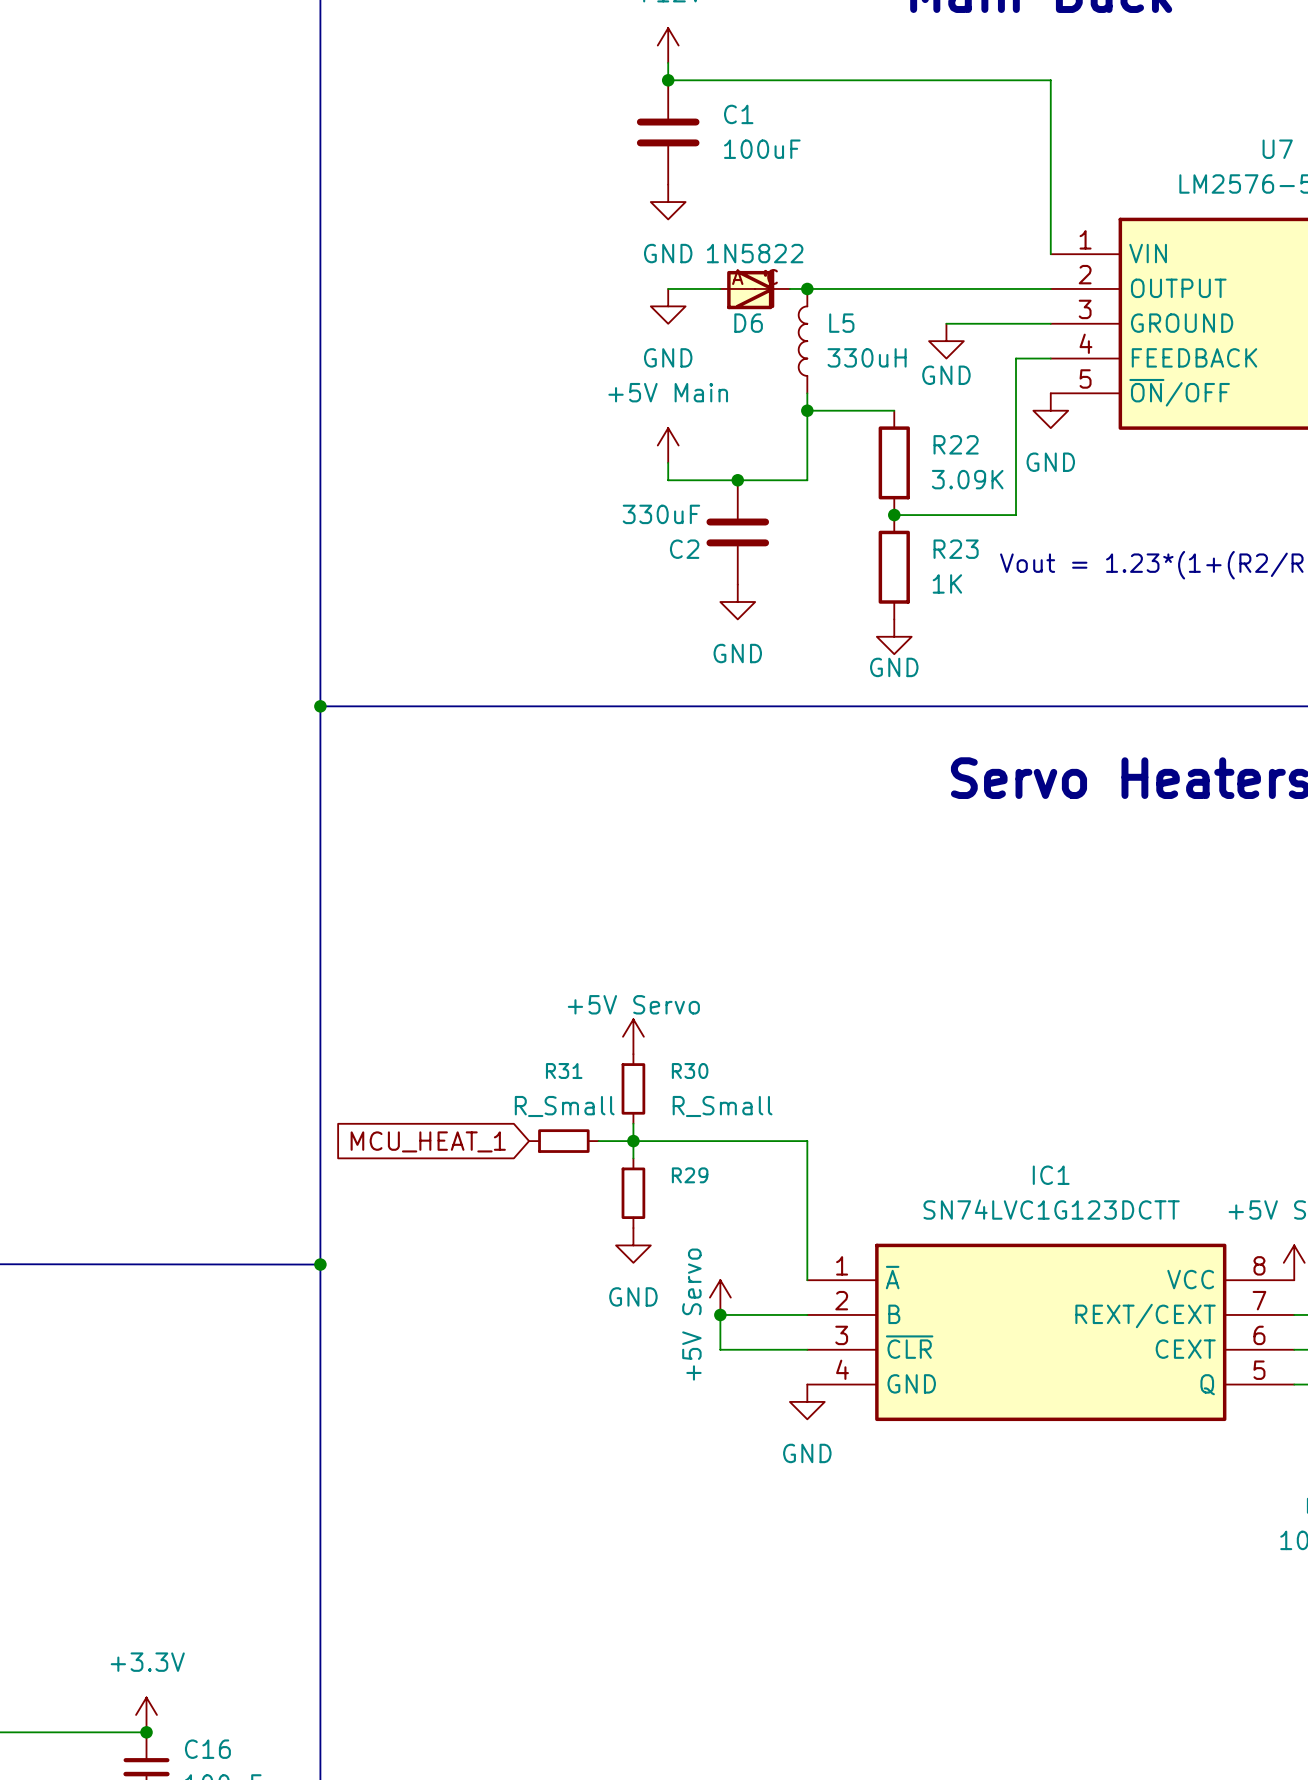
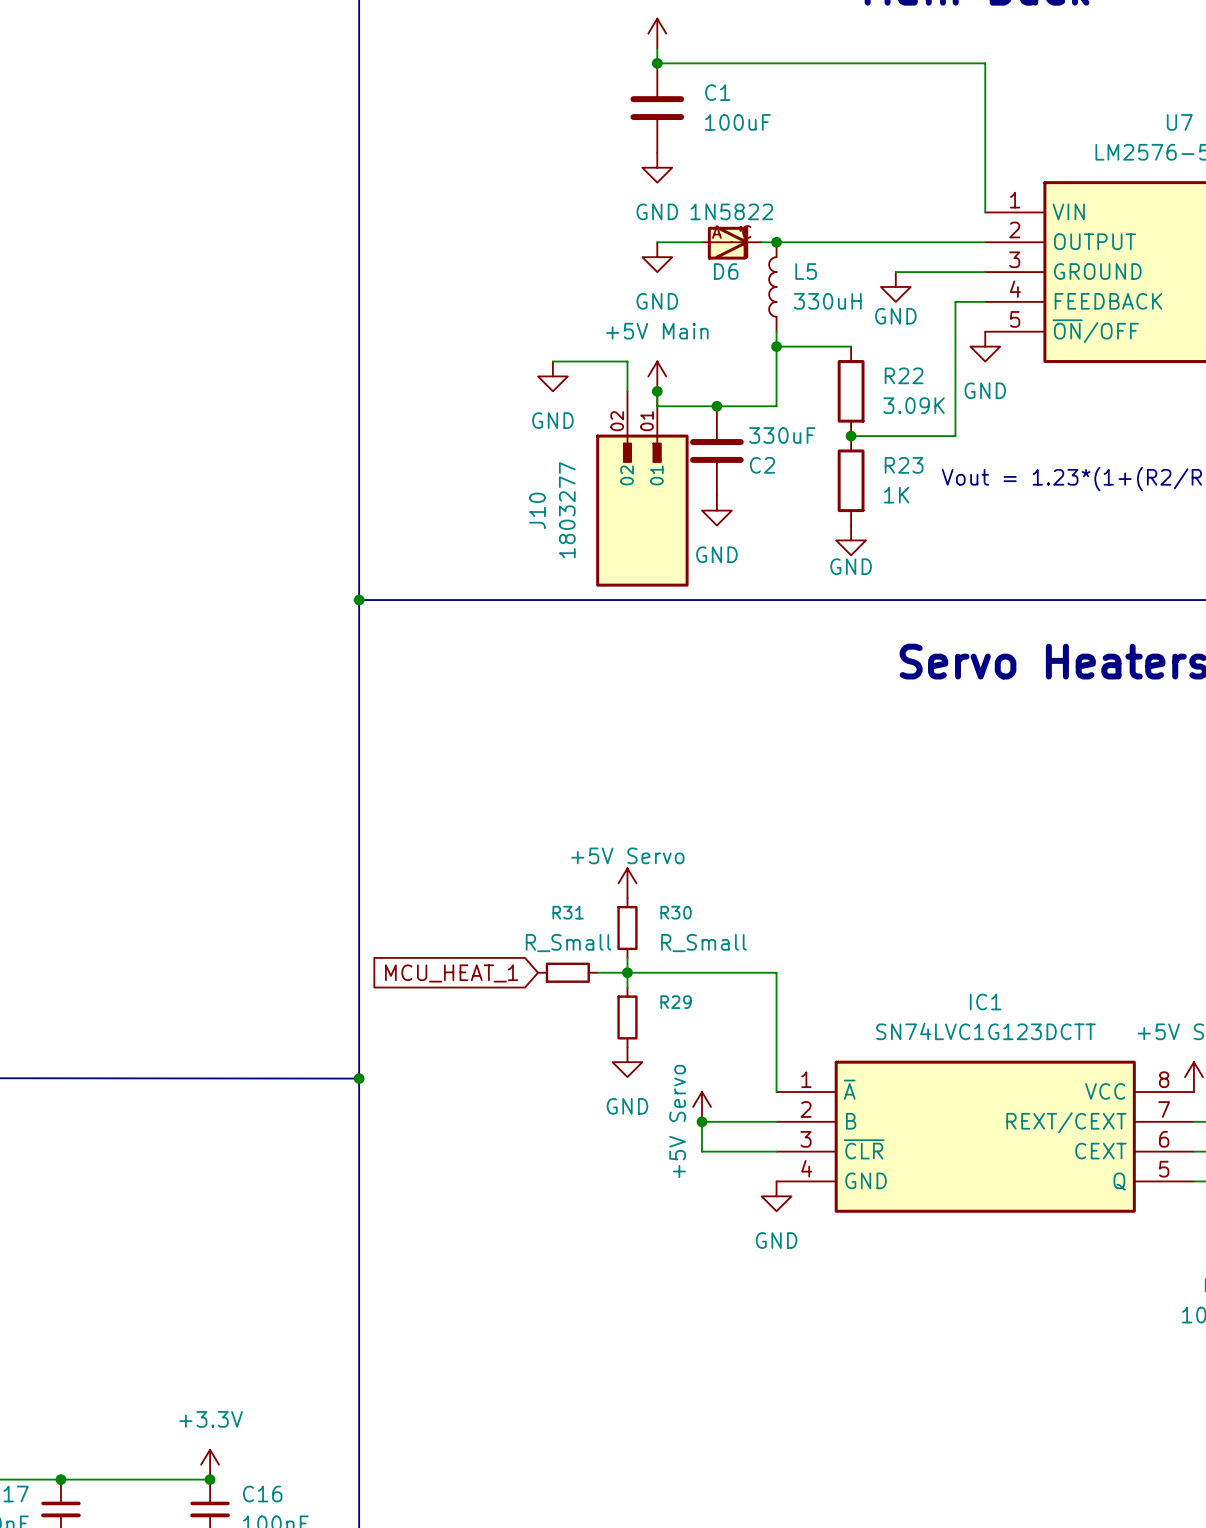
wire: none -> (552, 361) (627, 361) (627, 391)
power symbol: none -> GND (552, 376)
junction: none -> (657, 391)
C2 value position: 330uF (661, 514) -> 330uF (782, 435)
C2 name position: C2 (684, 549) -> C2 (762, 465)
J10: none -> 1803277 (642, 488)

